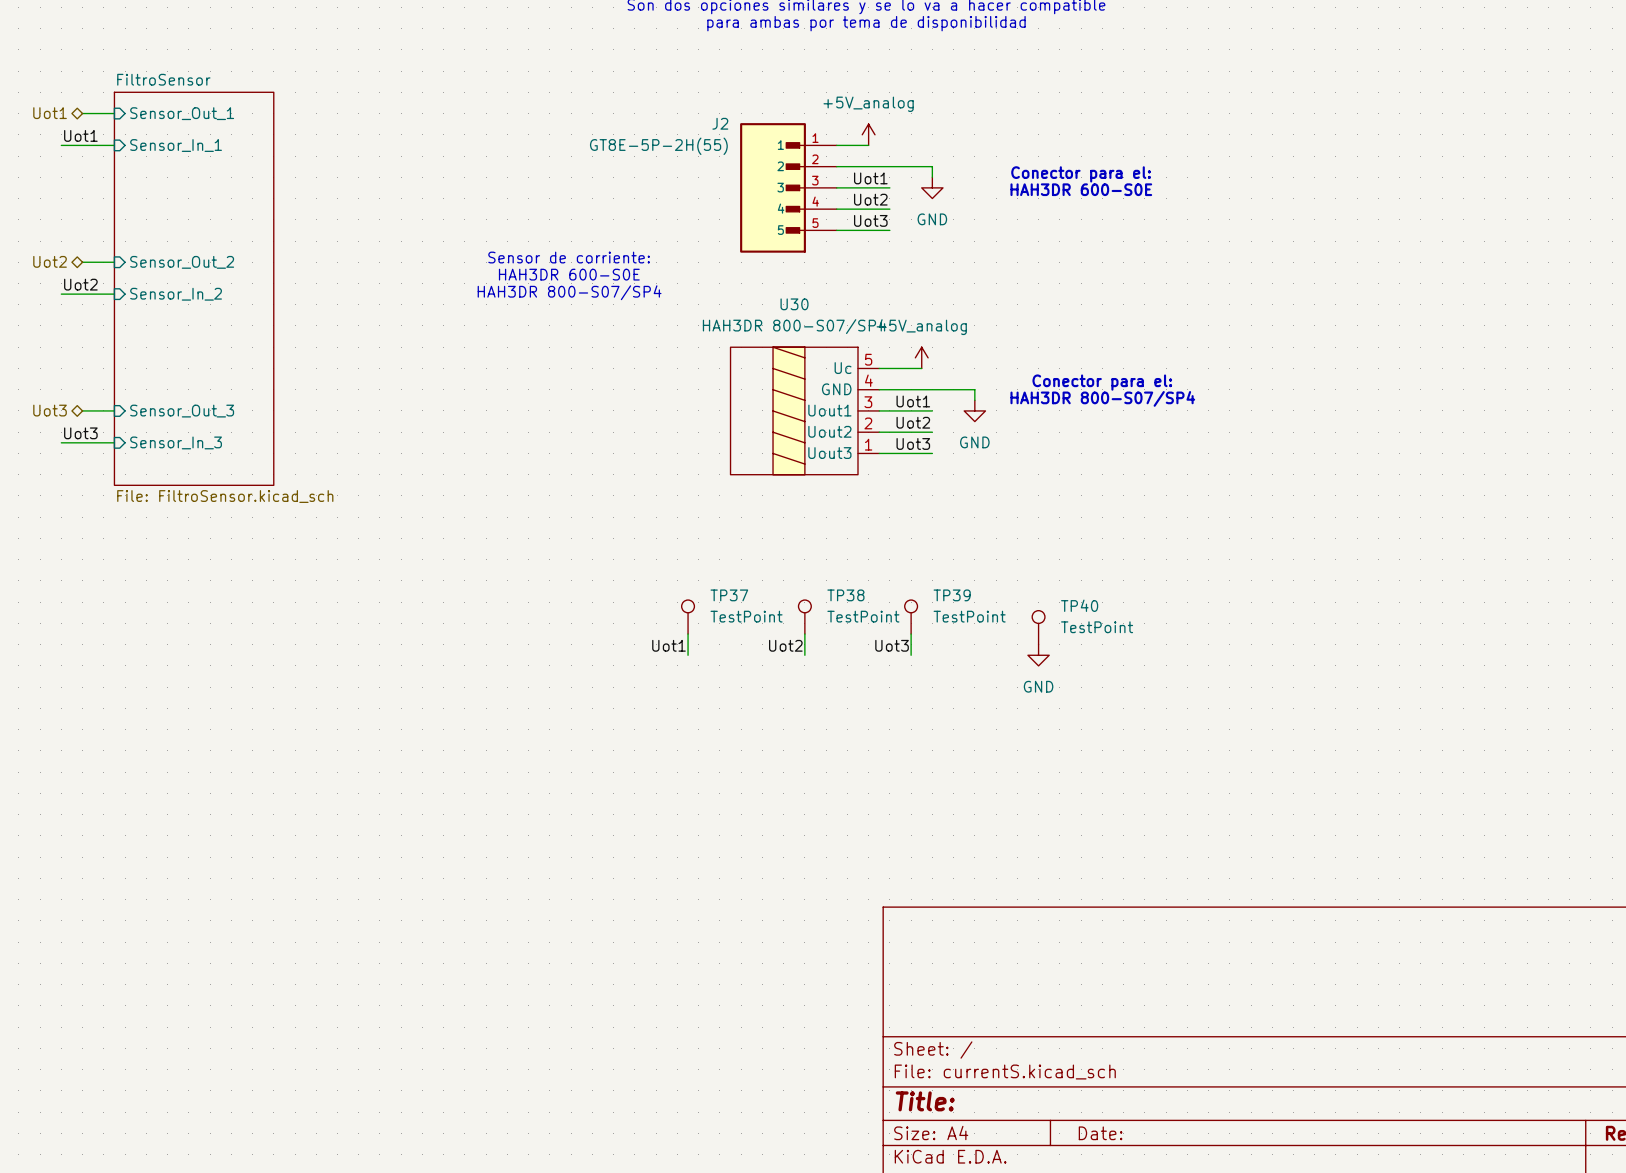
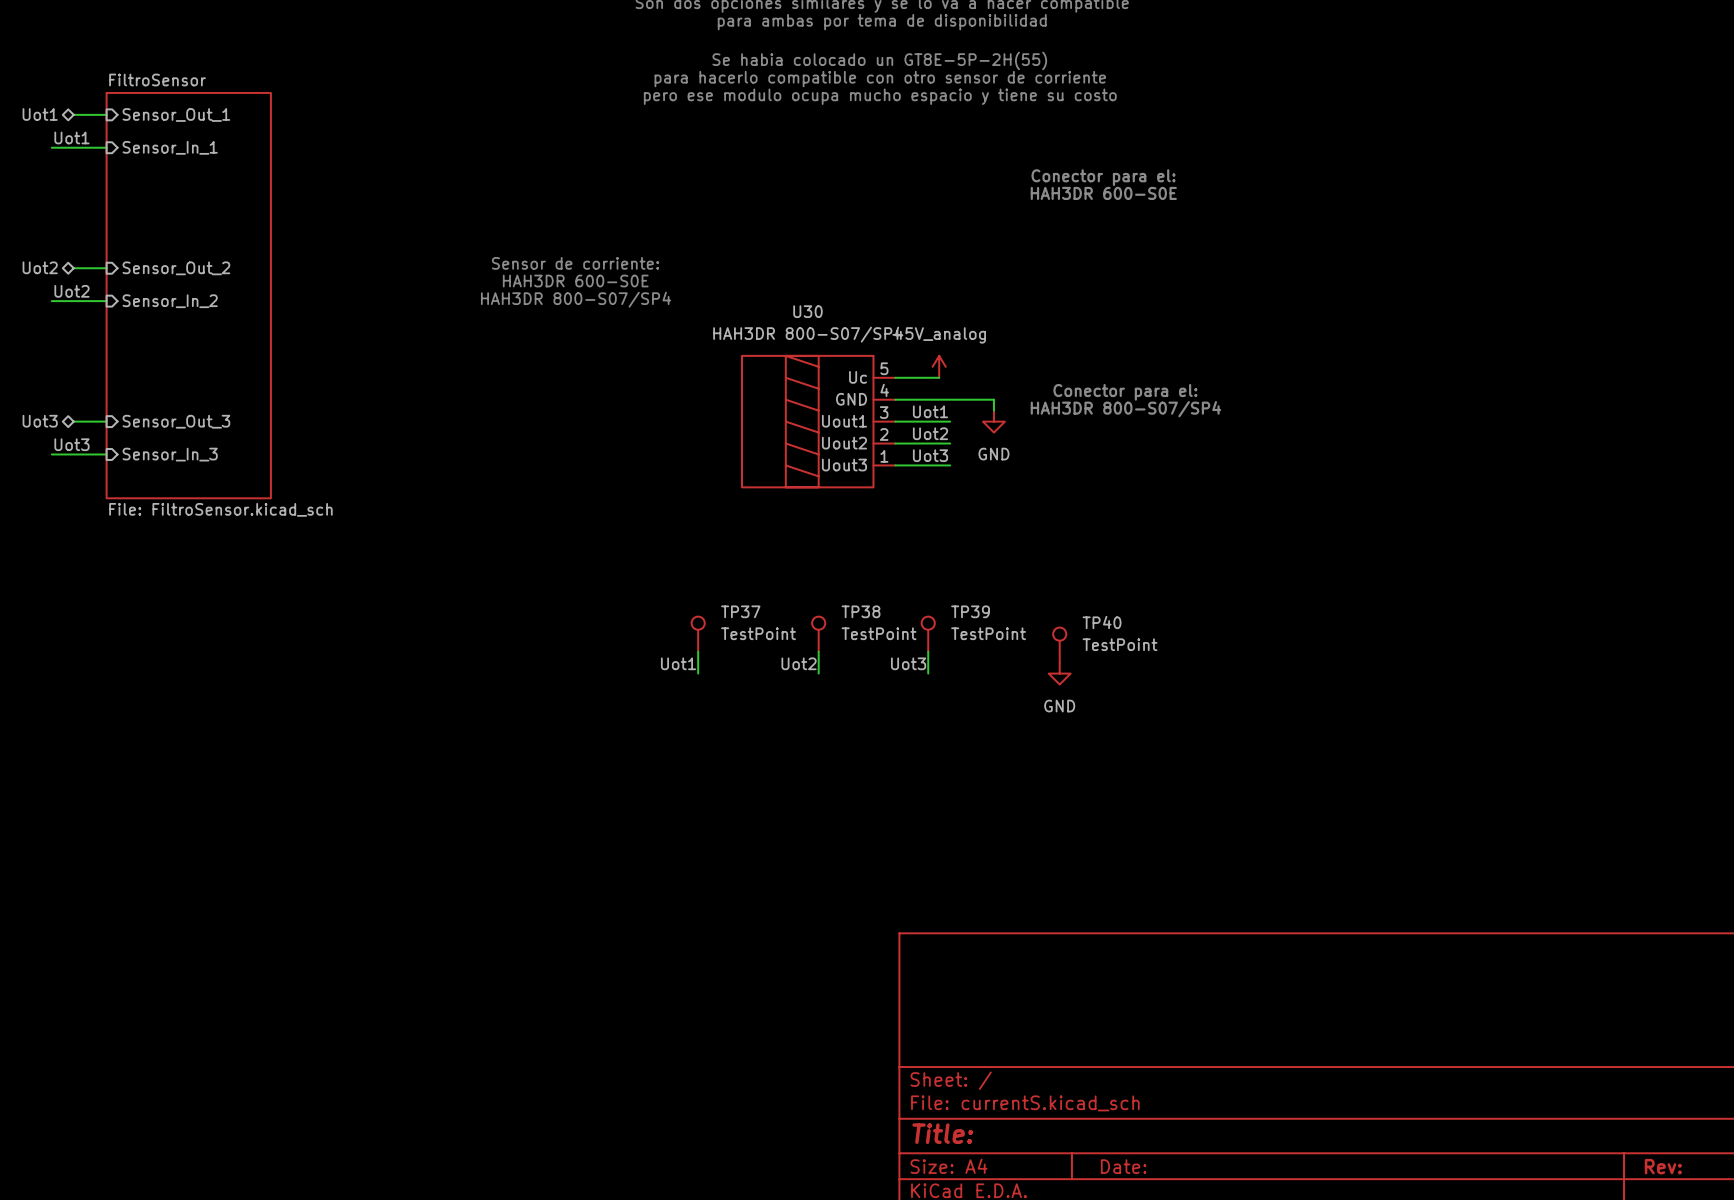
text: none -> Se habia colocado un GT8E-5P-2H(55) (879, 60)
text: none -> para hacerlo compatible con otro sensor de corriente (880, 79)
text: none -> pero ese modulo ocupa mucho espacio y tiene su costo (880, 96)
power symbol: +5V_analog (868, 134) -> none
wire: (836, 145) (868, 145) -> none
wire: (836, 166) (932, 166) (932, 177) -> none
label: Uot1 (870, 178) -> none
J2: GT8E-5P-2H(55) (788, 187) -> none
wire: (836, 187) (889, 187) -> none
power symbol: GND (932, 187) -> none
label: Uot2 (870, 199) -> none
wire: (836, 209) (889, 209) -> none
label: Uot3 (870, 220) -> none
wire: (836, 230) (889, 230) -> none

